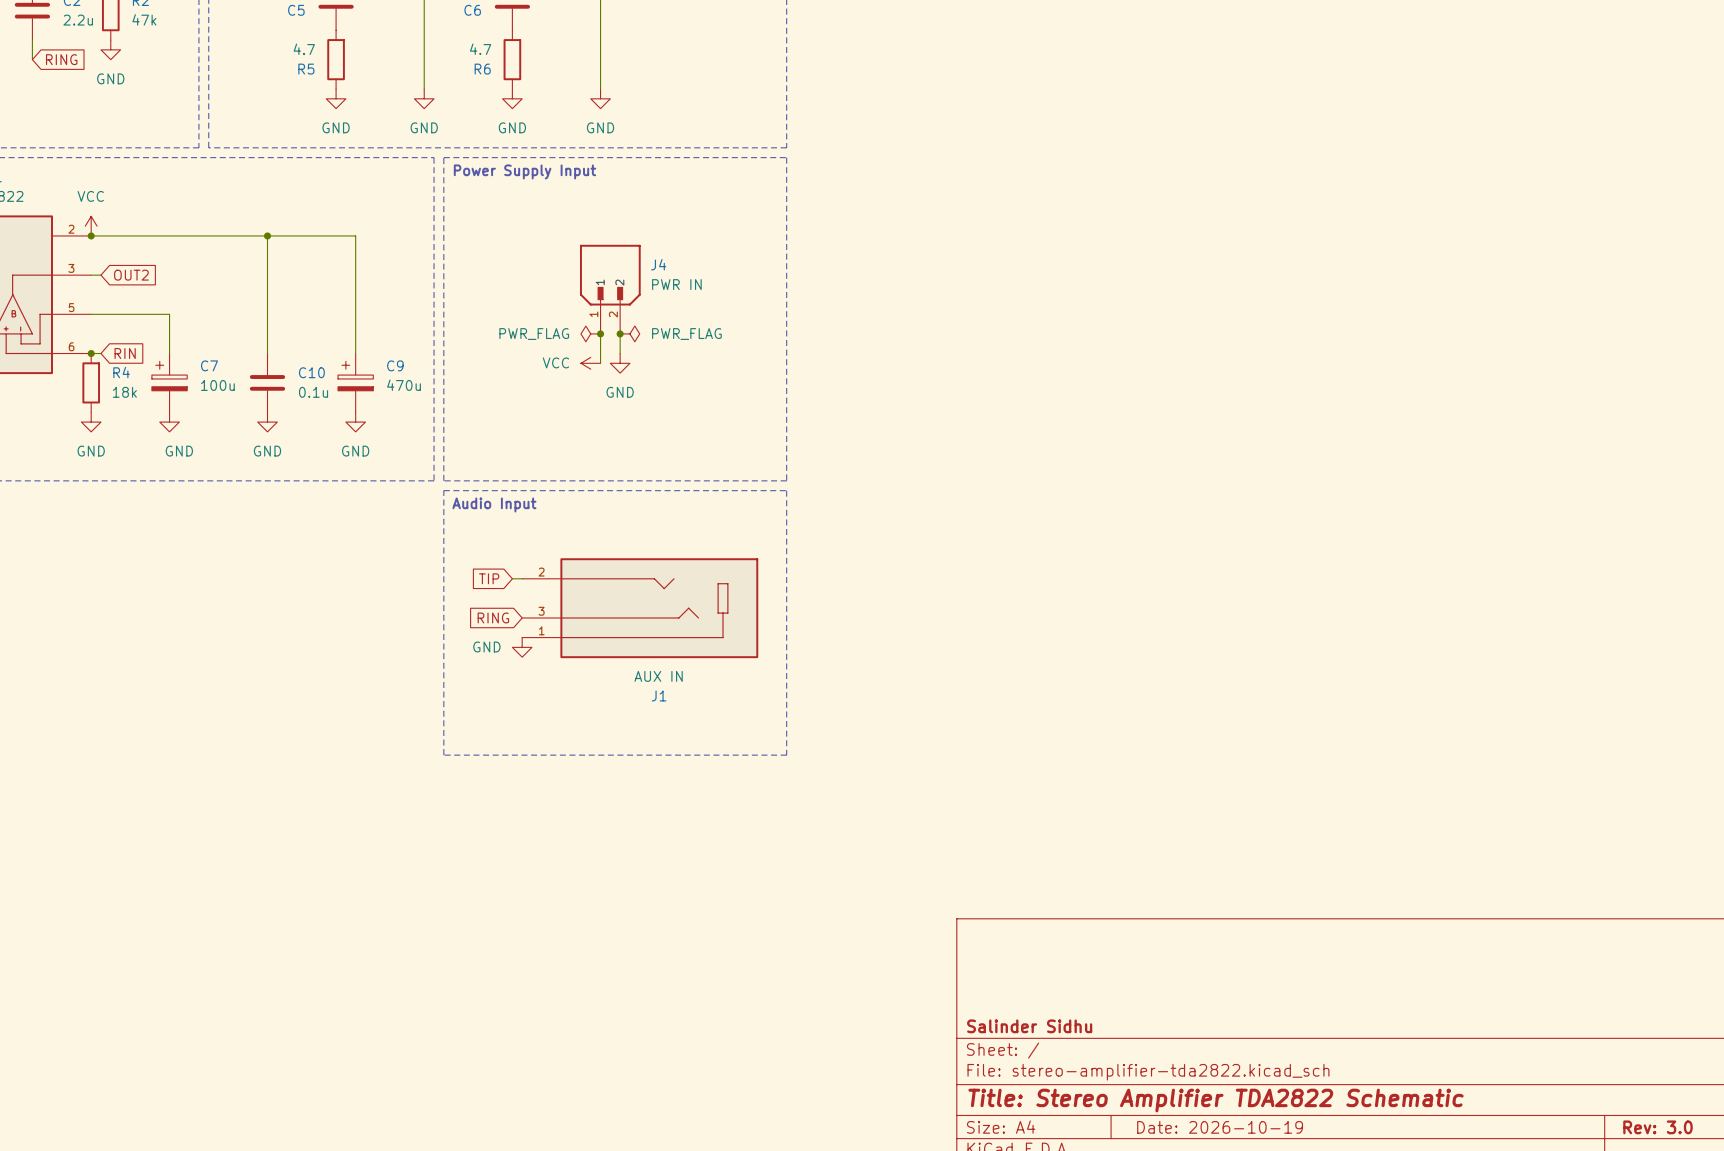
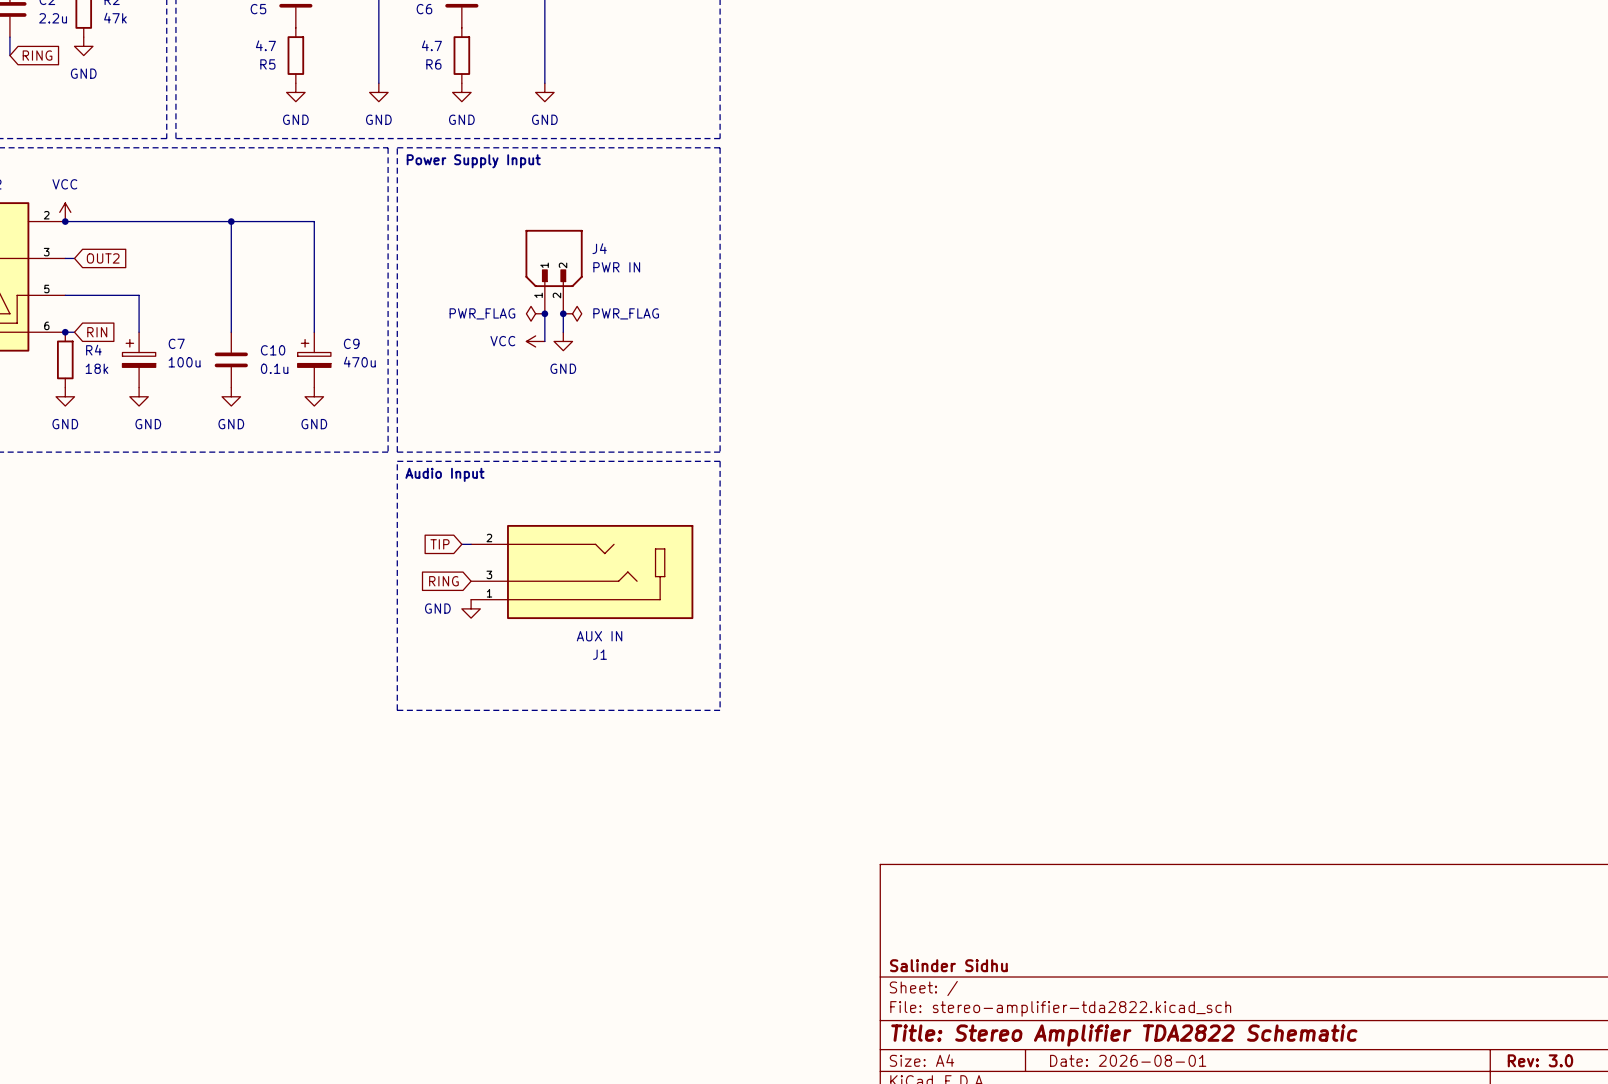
title block: Date: 2026-10-19 (1220, 1127) -> Date: 2026-08-01 (1128, 1060)

